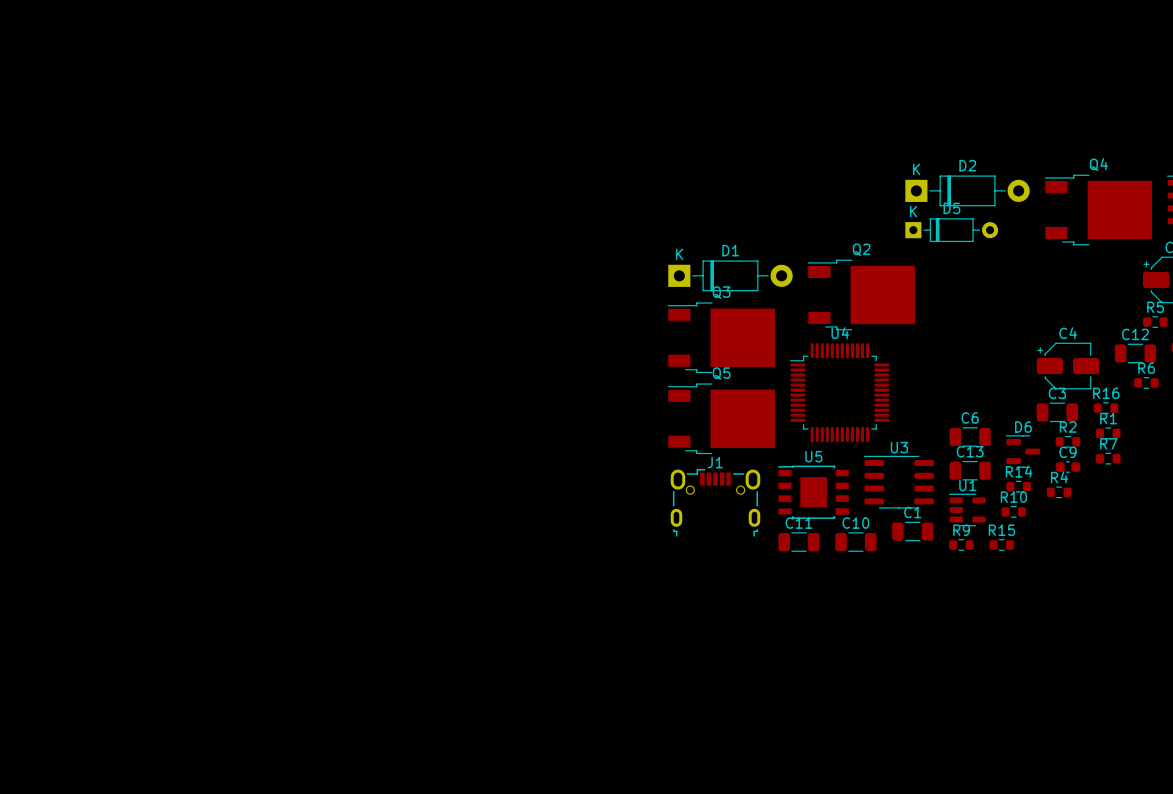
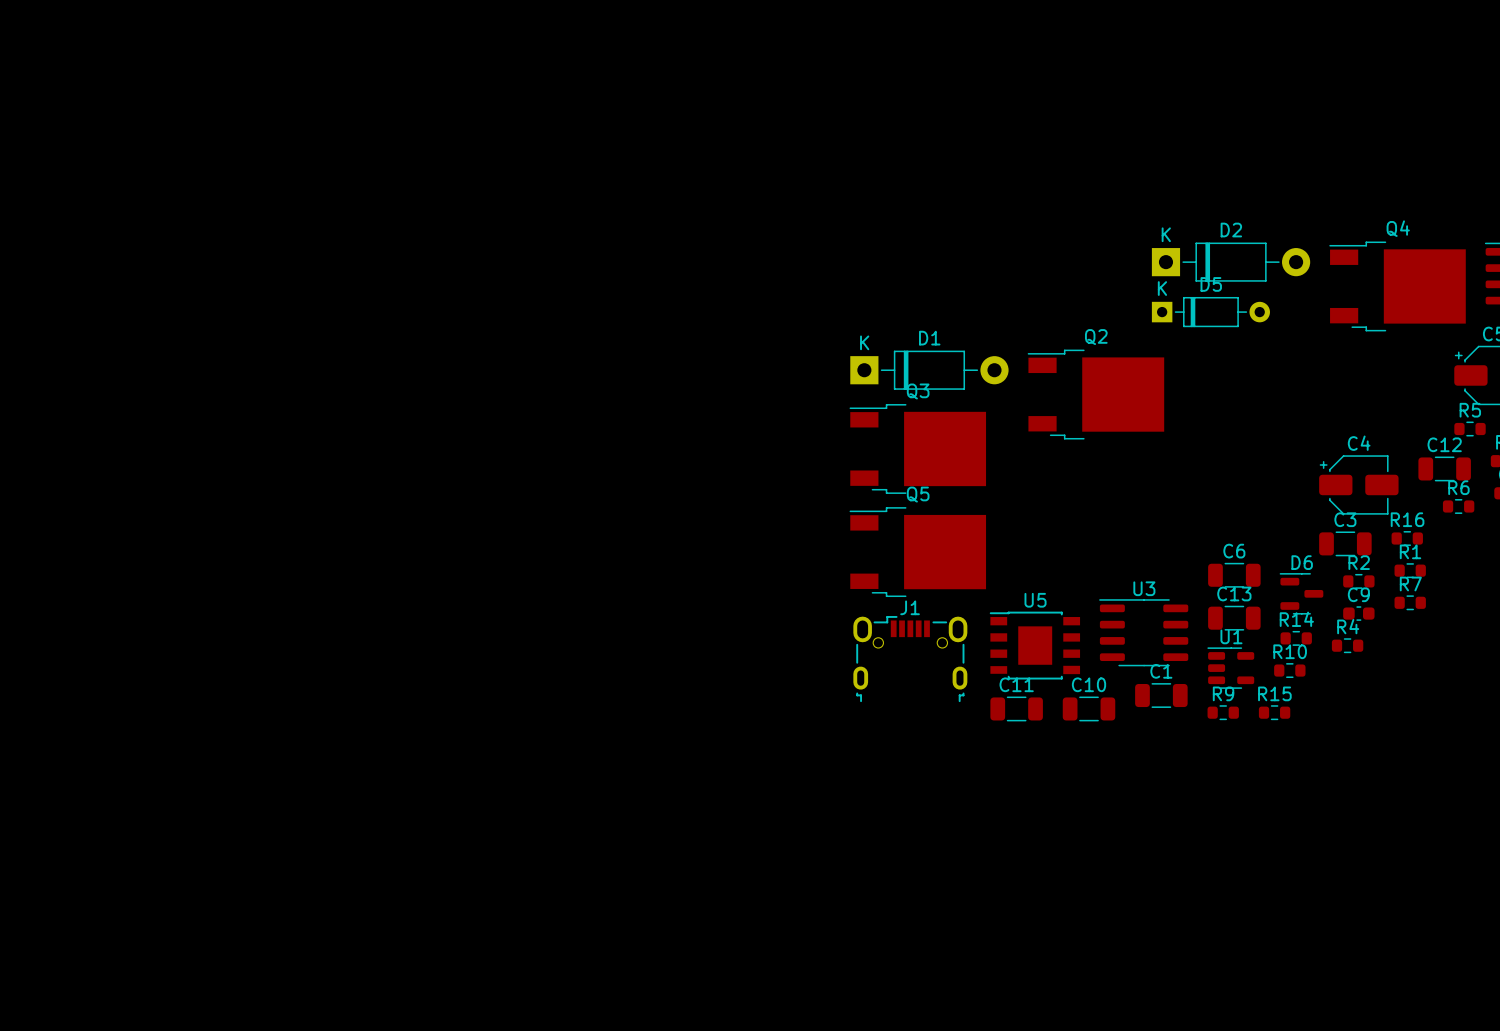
U4: (839, 392) -> none

